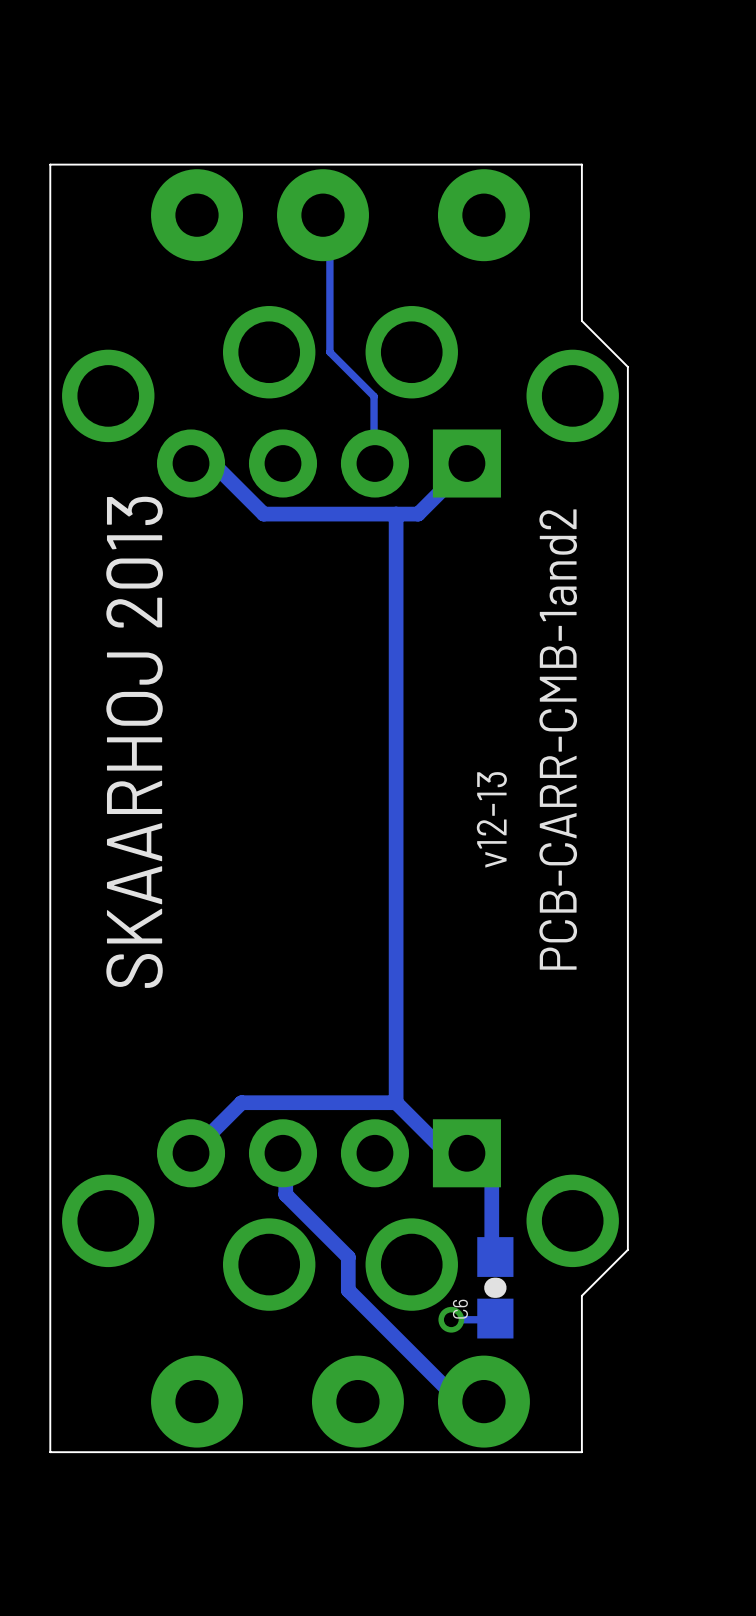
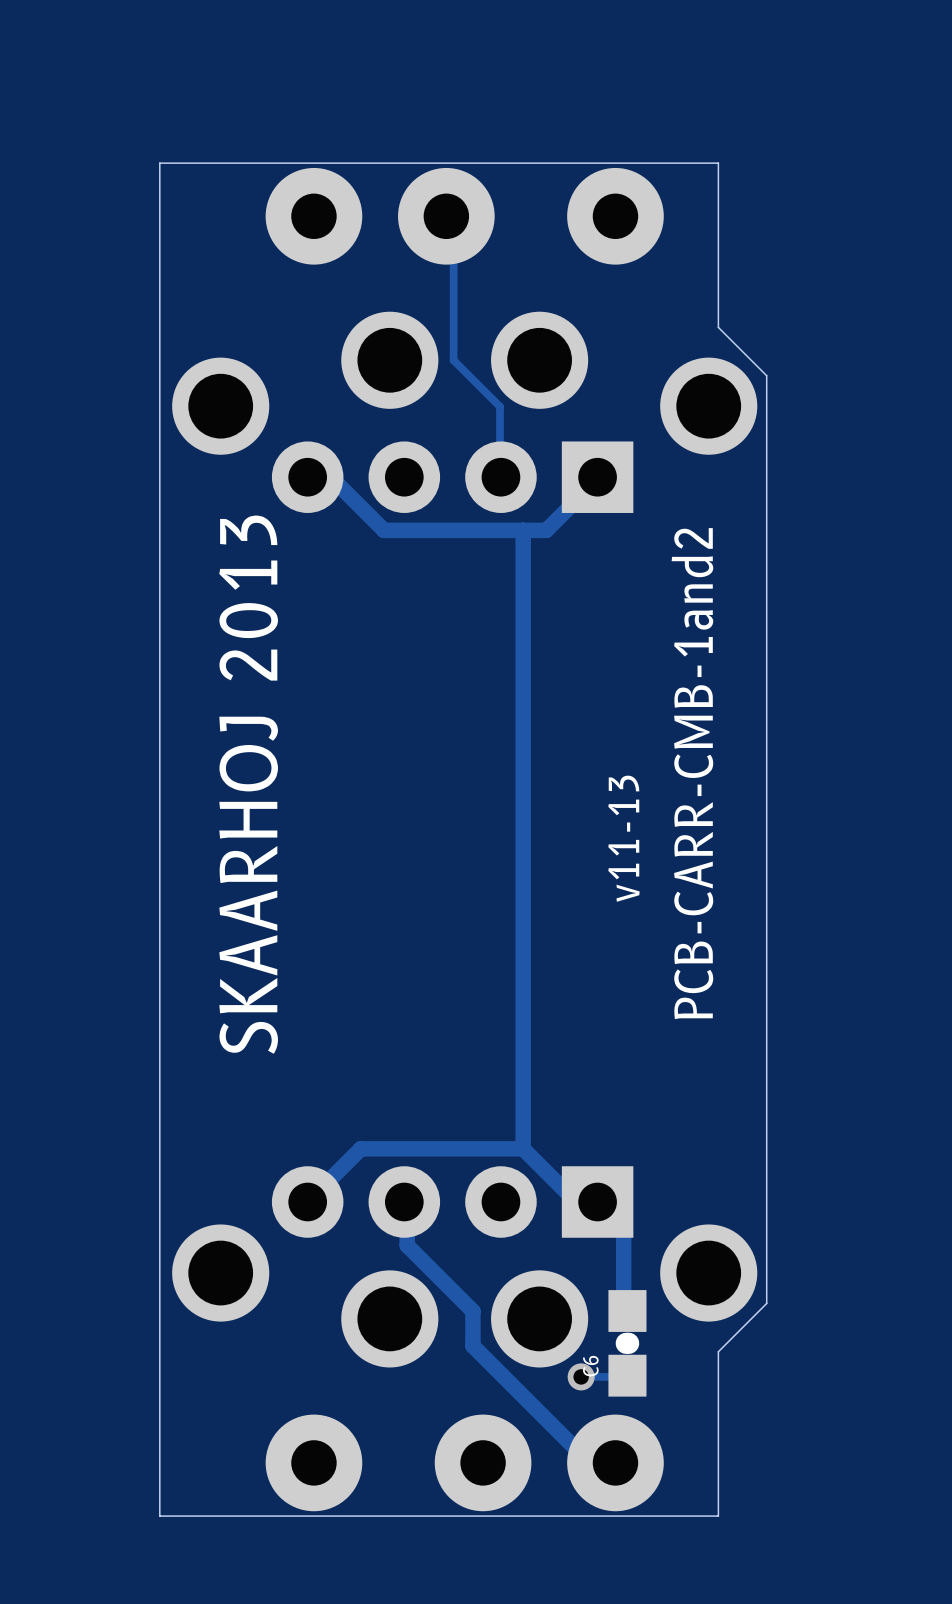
text: v12-13 (491, 819) -> v11-13 (623, 838)

